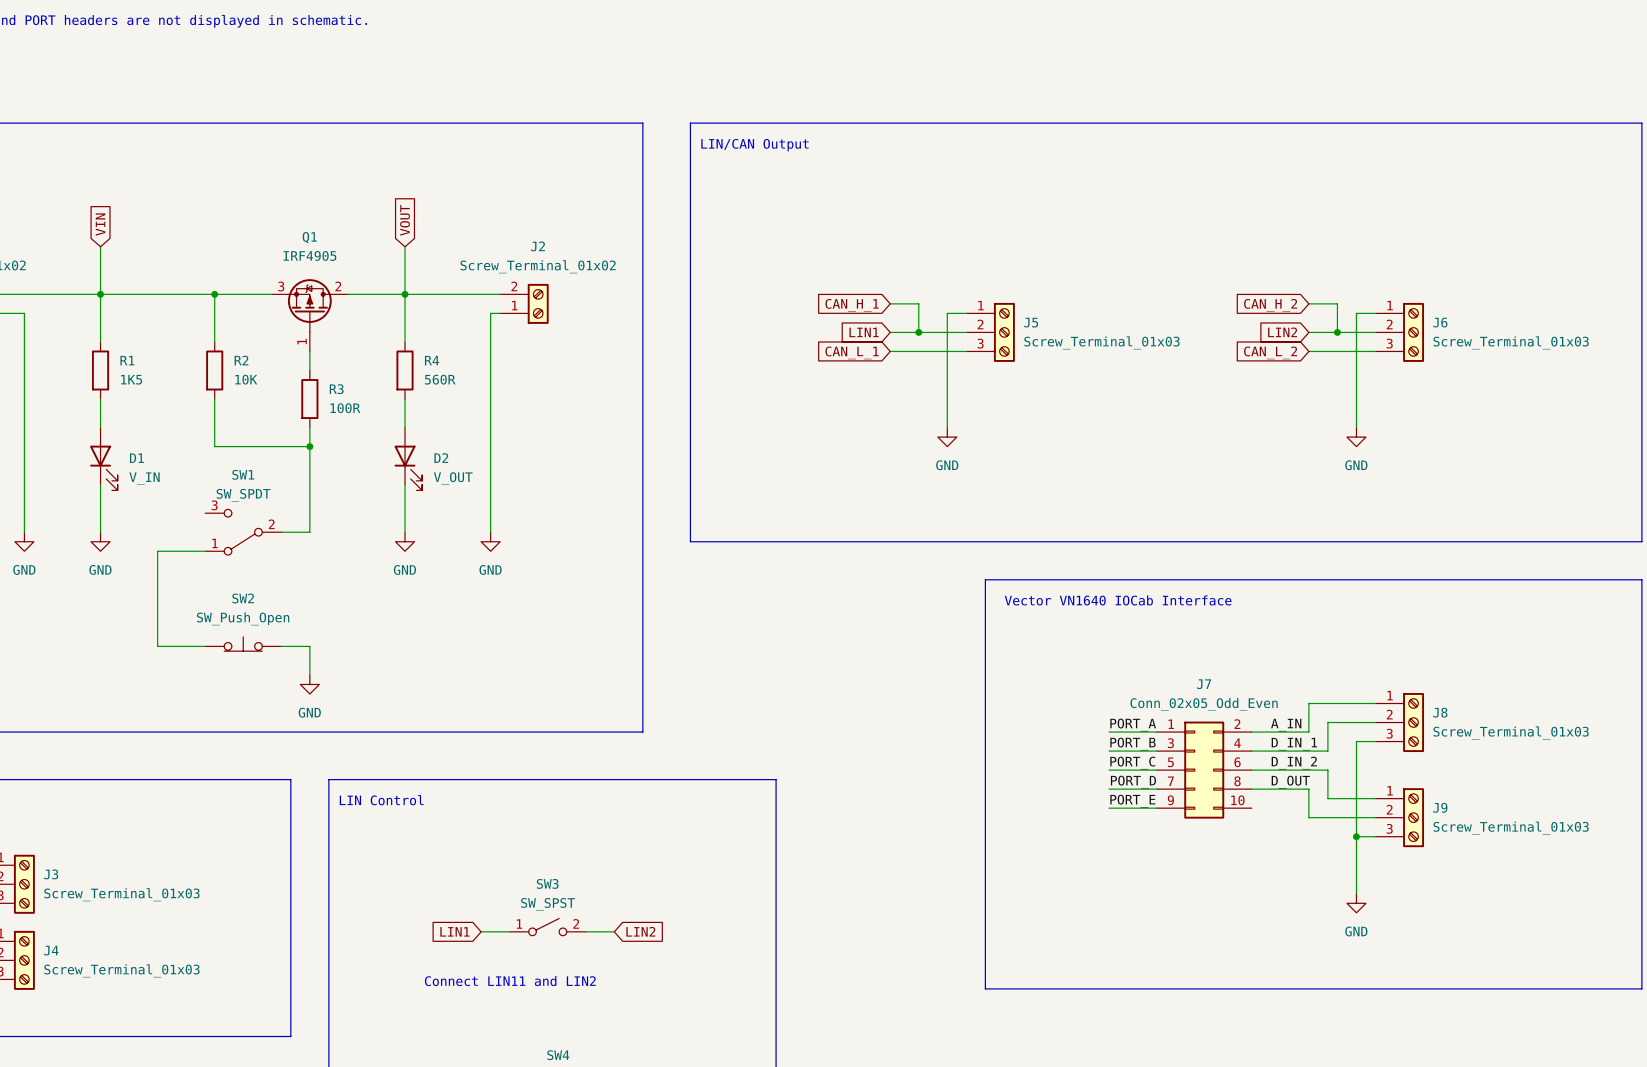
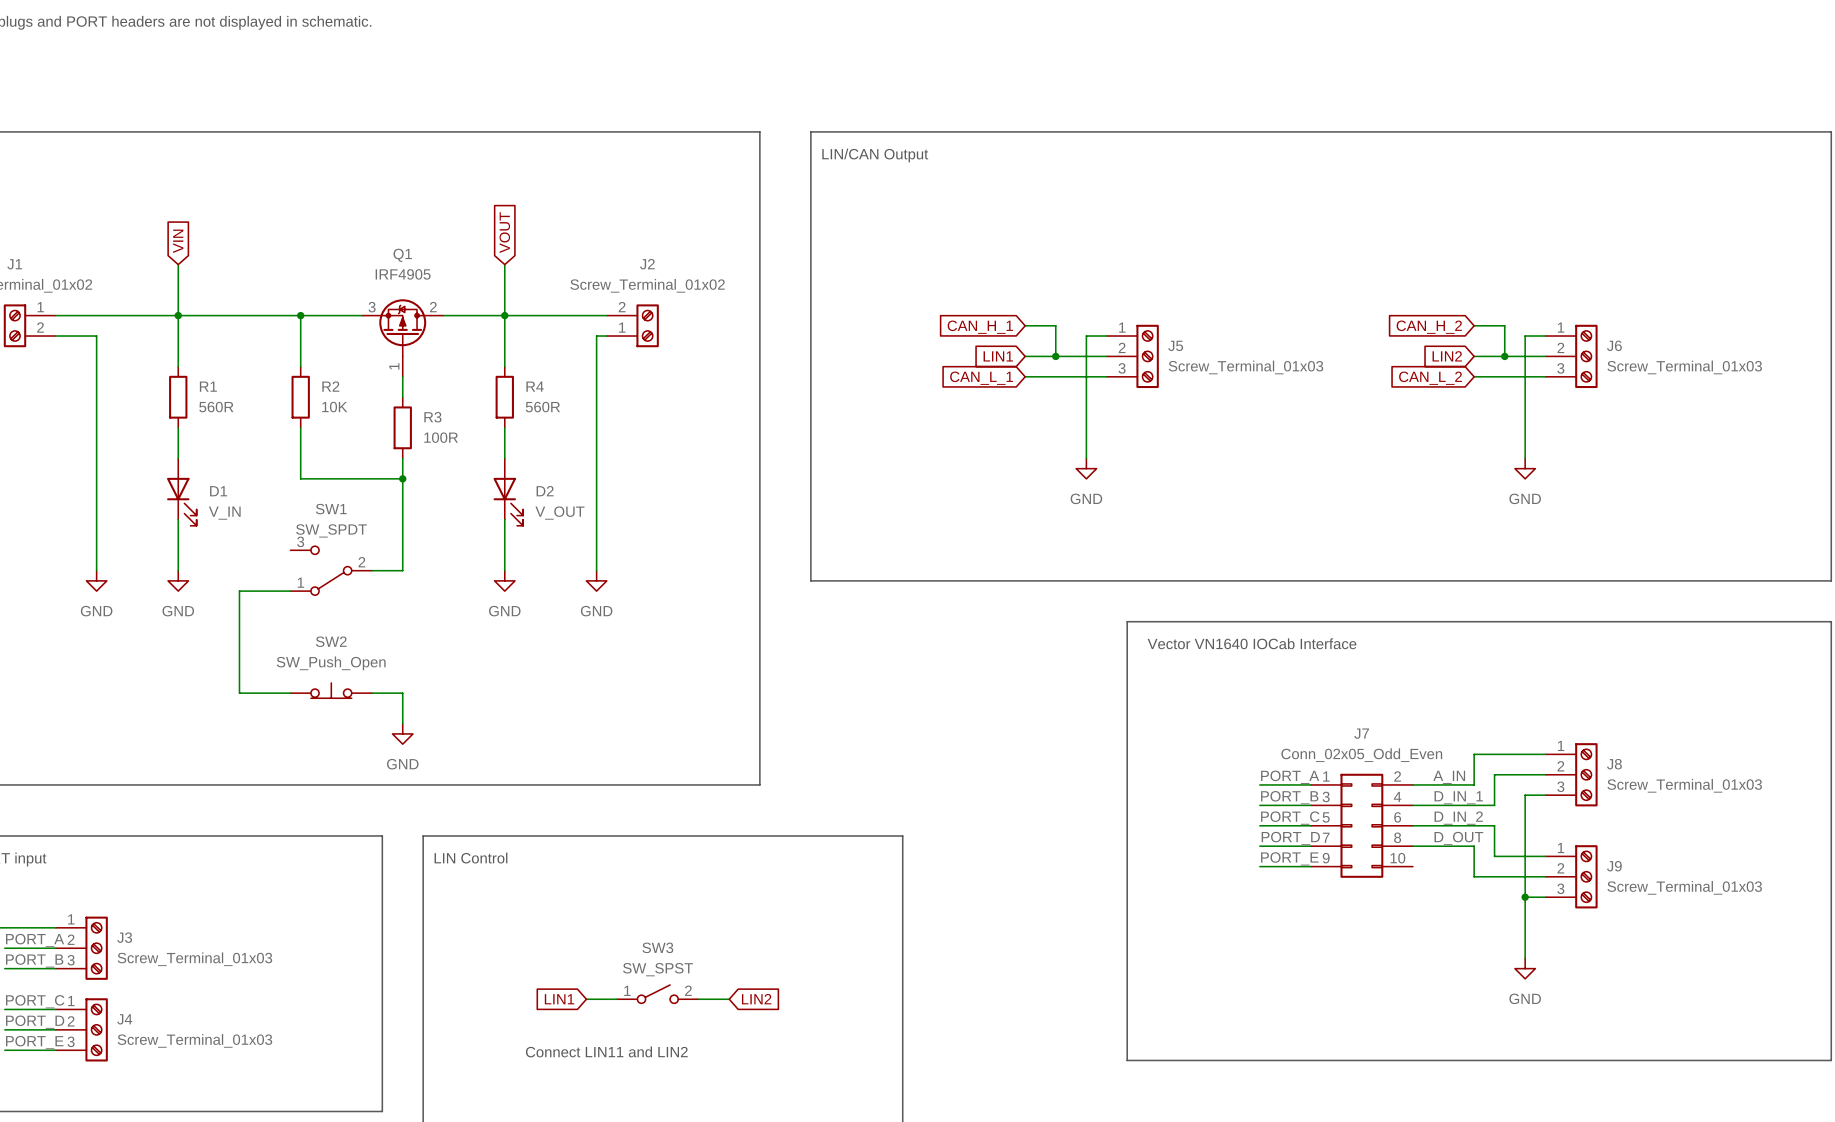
R1 value: 1K5 (131, 379) -> 560R (216, 407)

